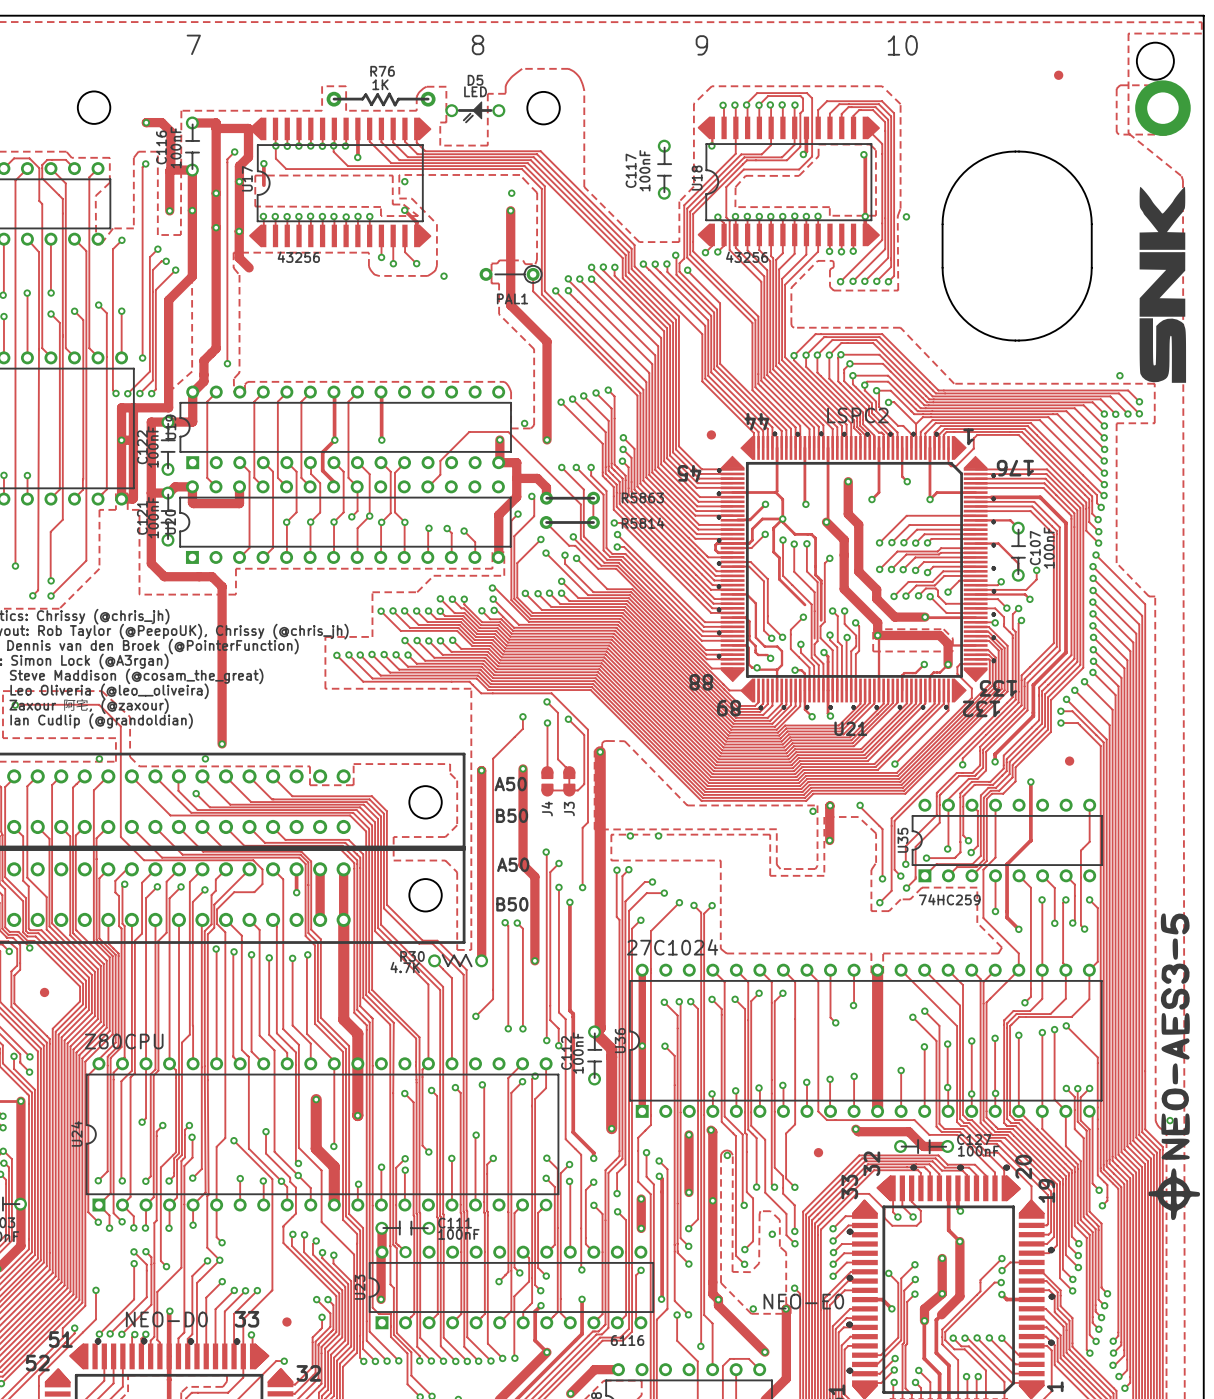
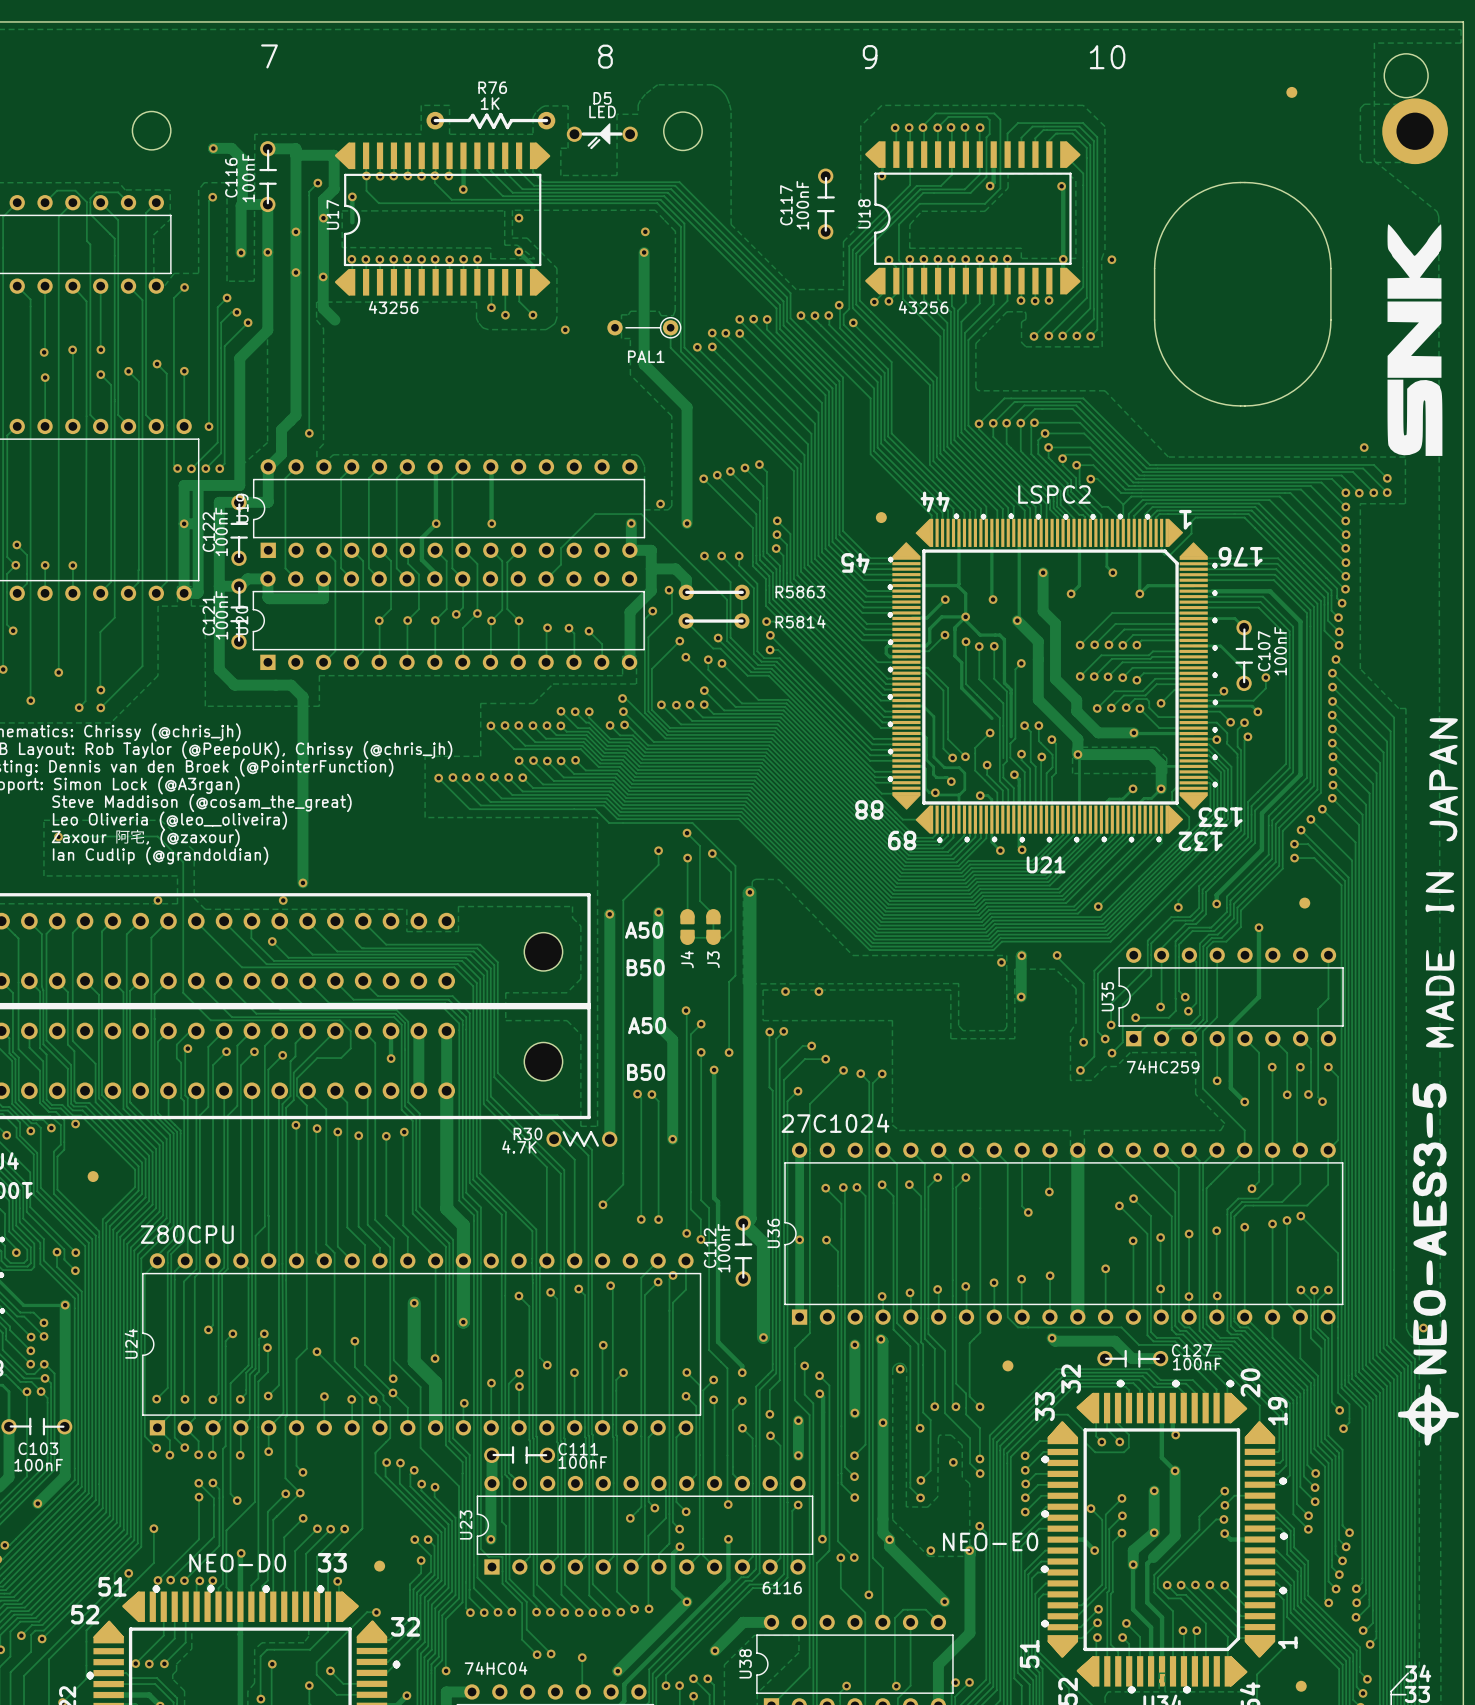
drawing: none -> [1398, 718, 1459, 1446]

